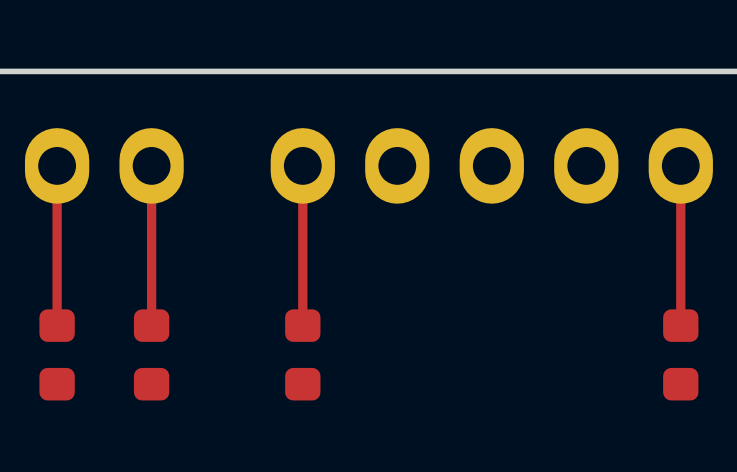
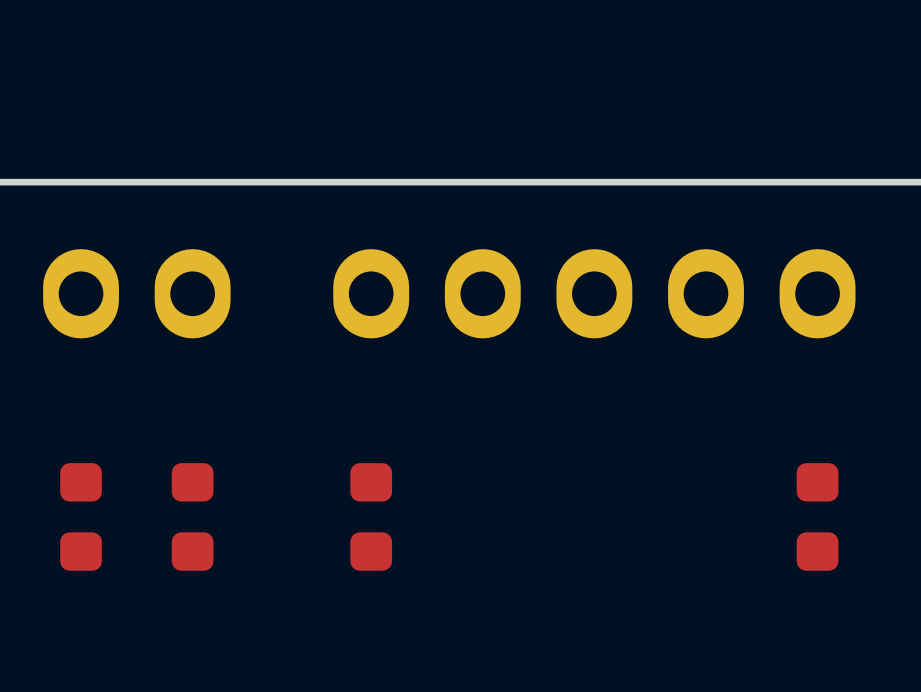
top track: (57, 165) (57, 325) -> none
top track: (151, 165) (151, 325) -> none
top track: (302, 165) (302, 325) -> none
top track: (680, 165) (680, 325) -> none

